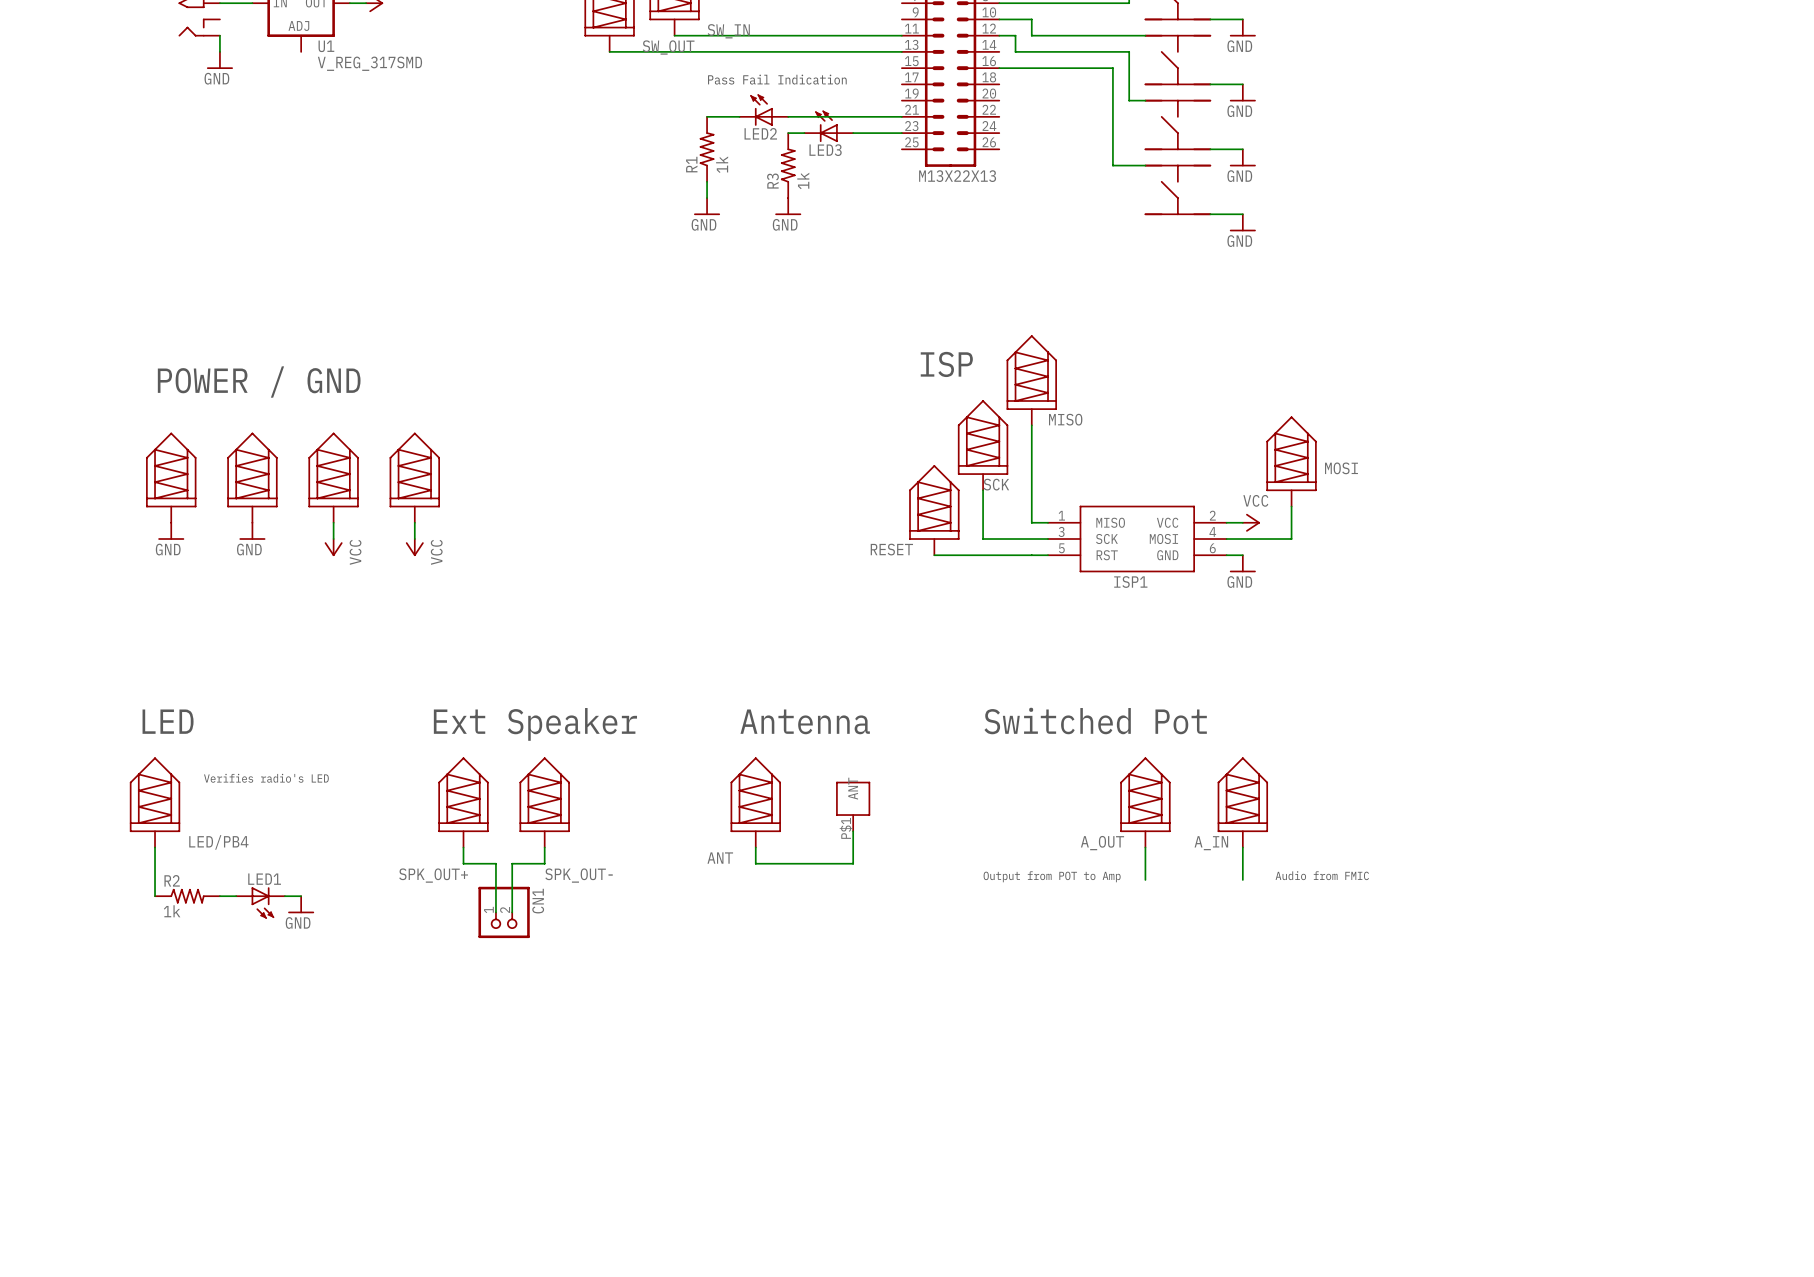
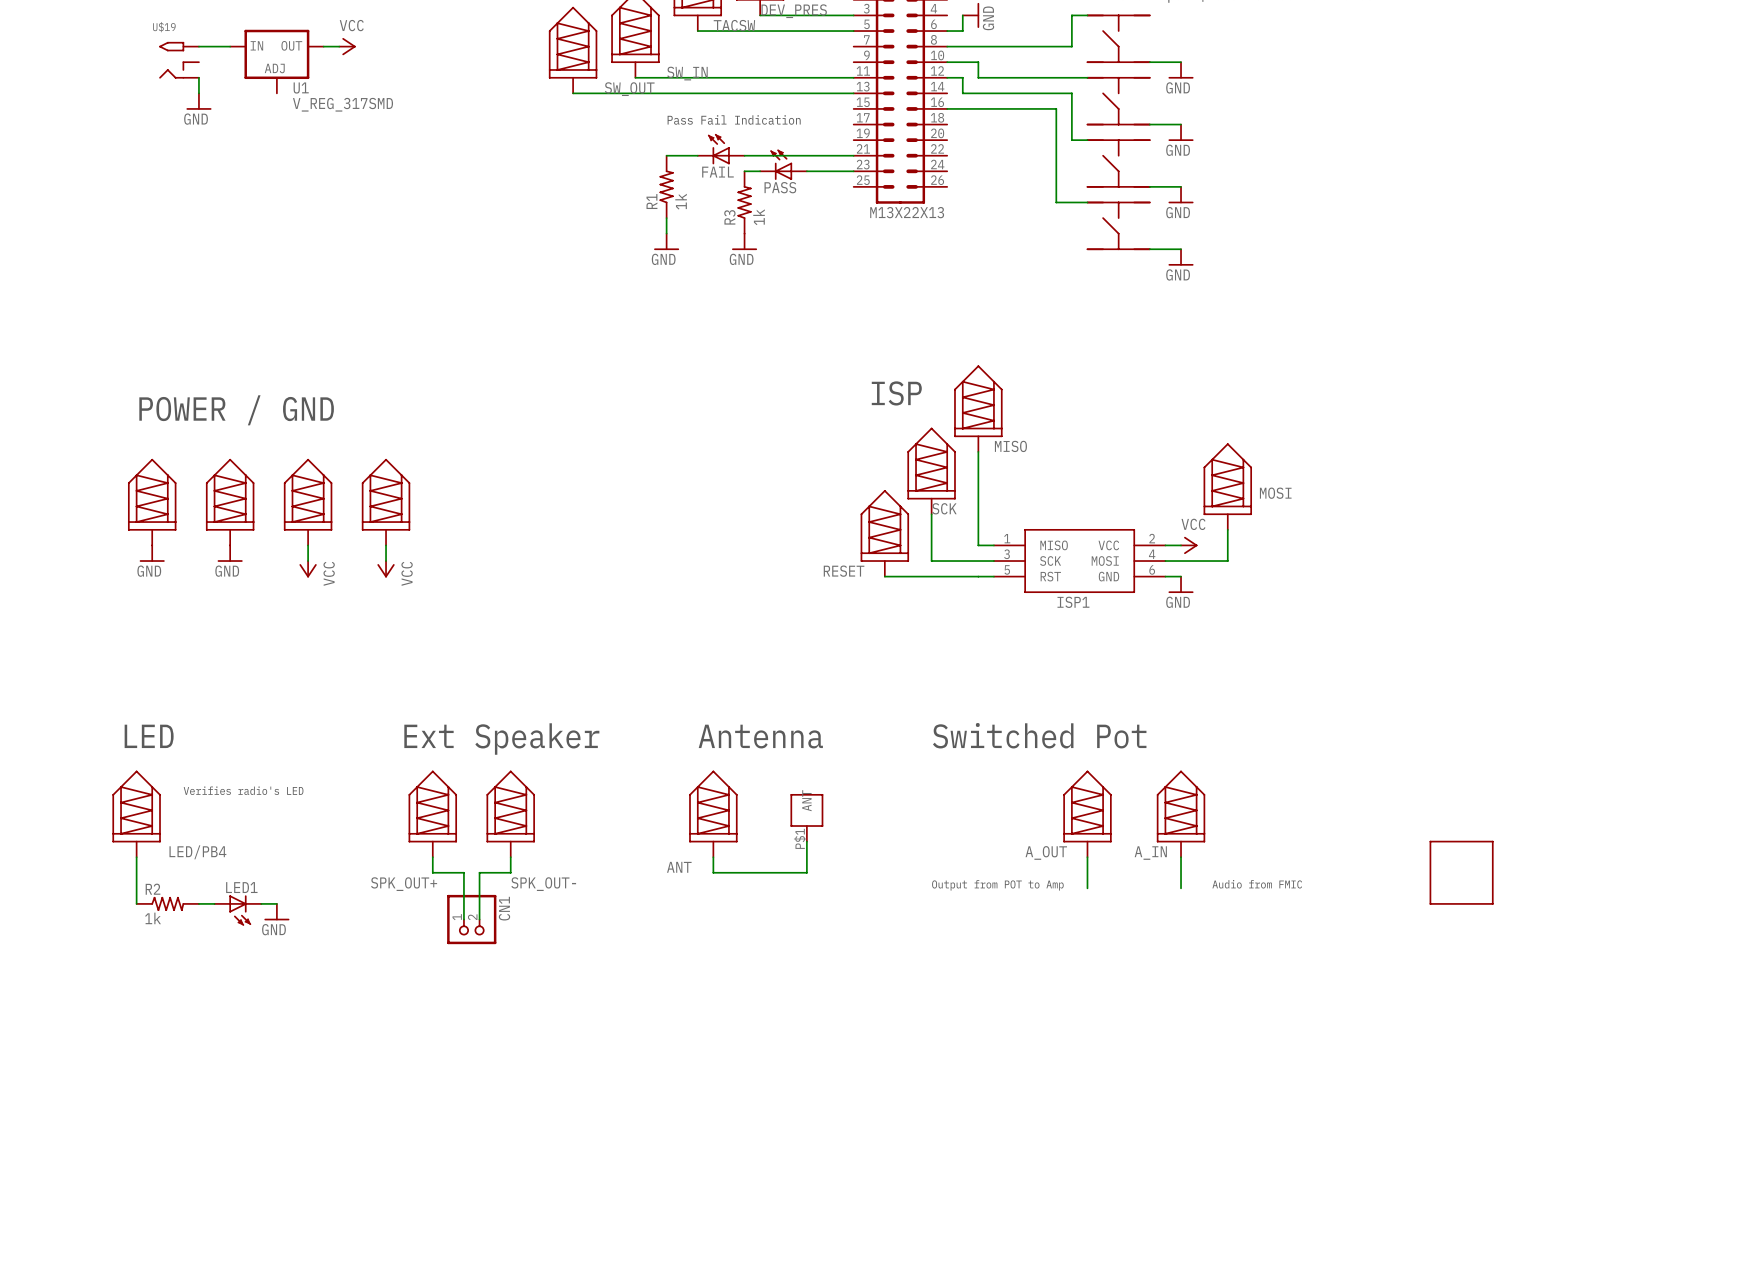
LED2 name: LED2 (760, 133) -> FAIL (717, 172)
LED3 name: LED3 (825, 150) -> PASS (780, 187)
part: none -> (1461, 872)

